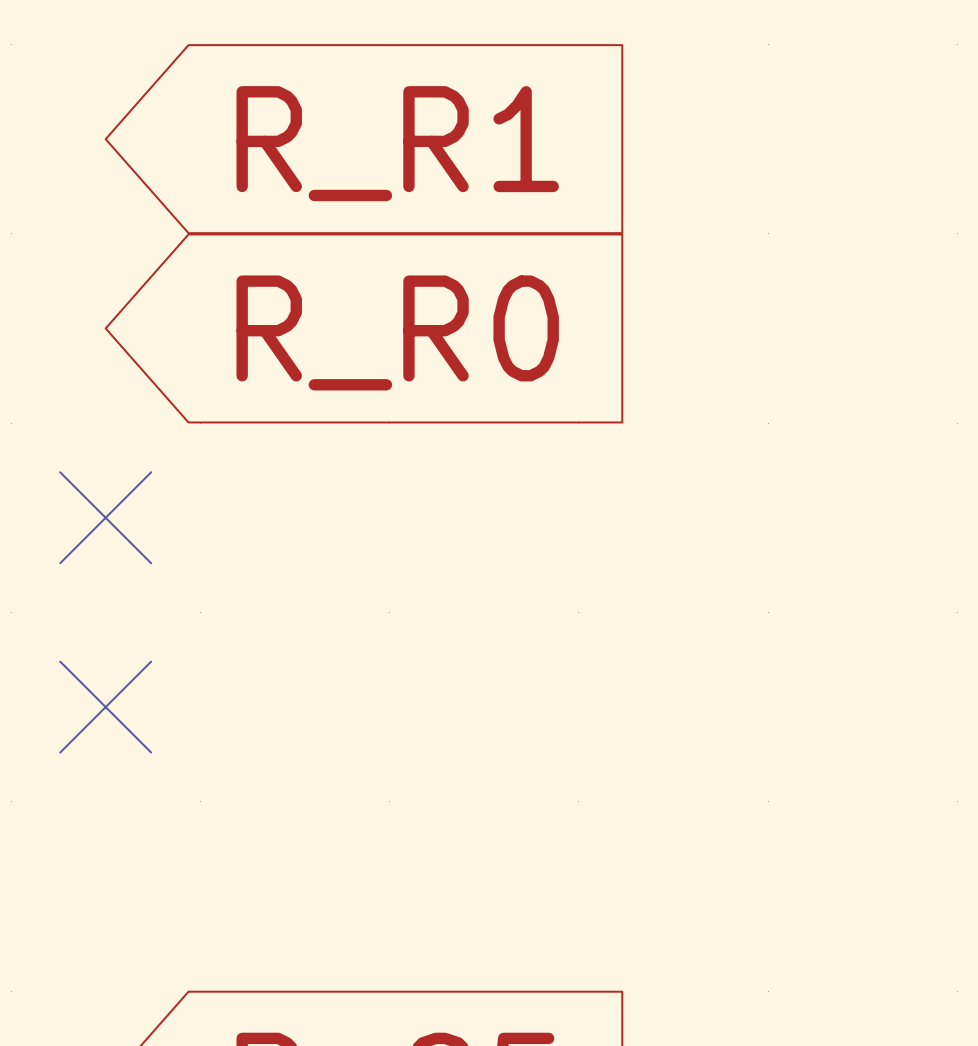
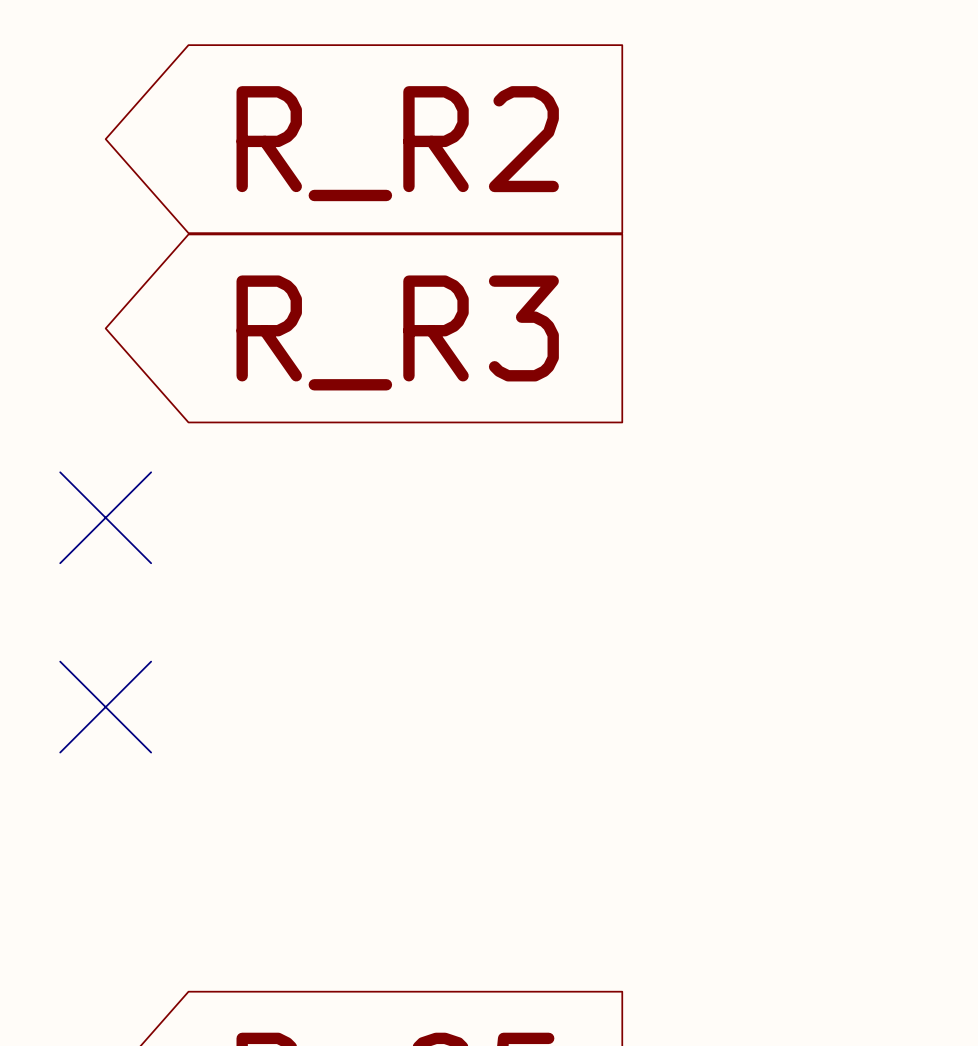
global label: R_R1 (397, 143) -> R_R2 (397, 143)
global label: R_R0 (397, 332) -> R_R3 (397, 332)

